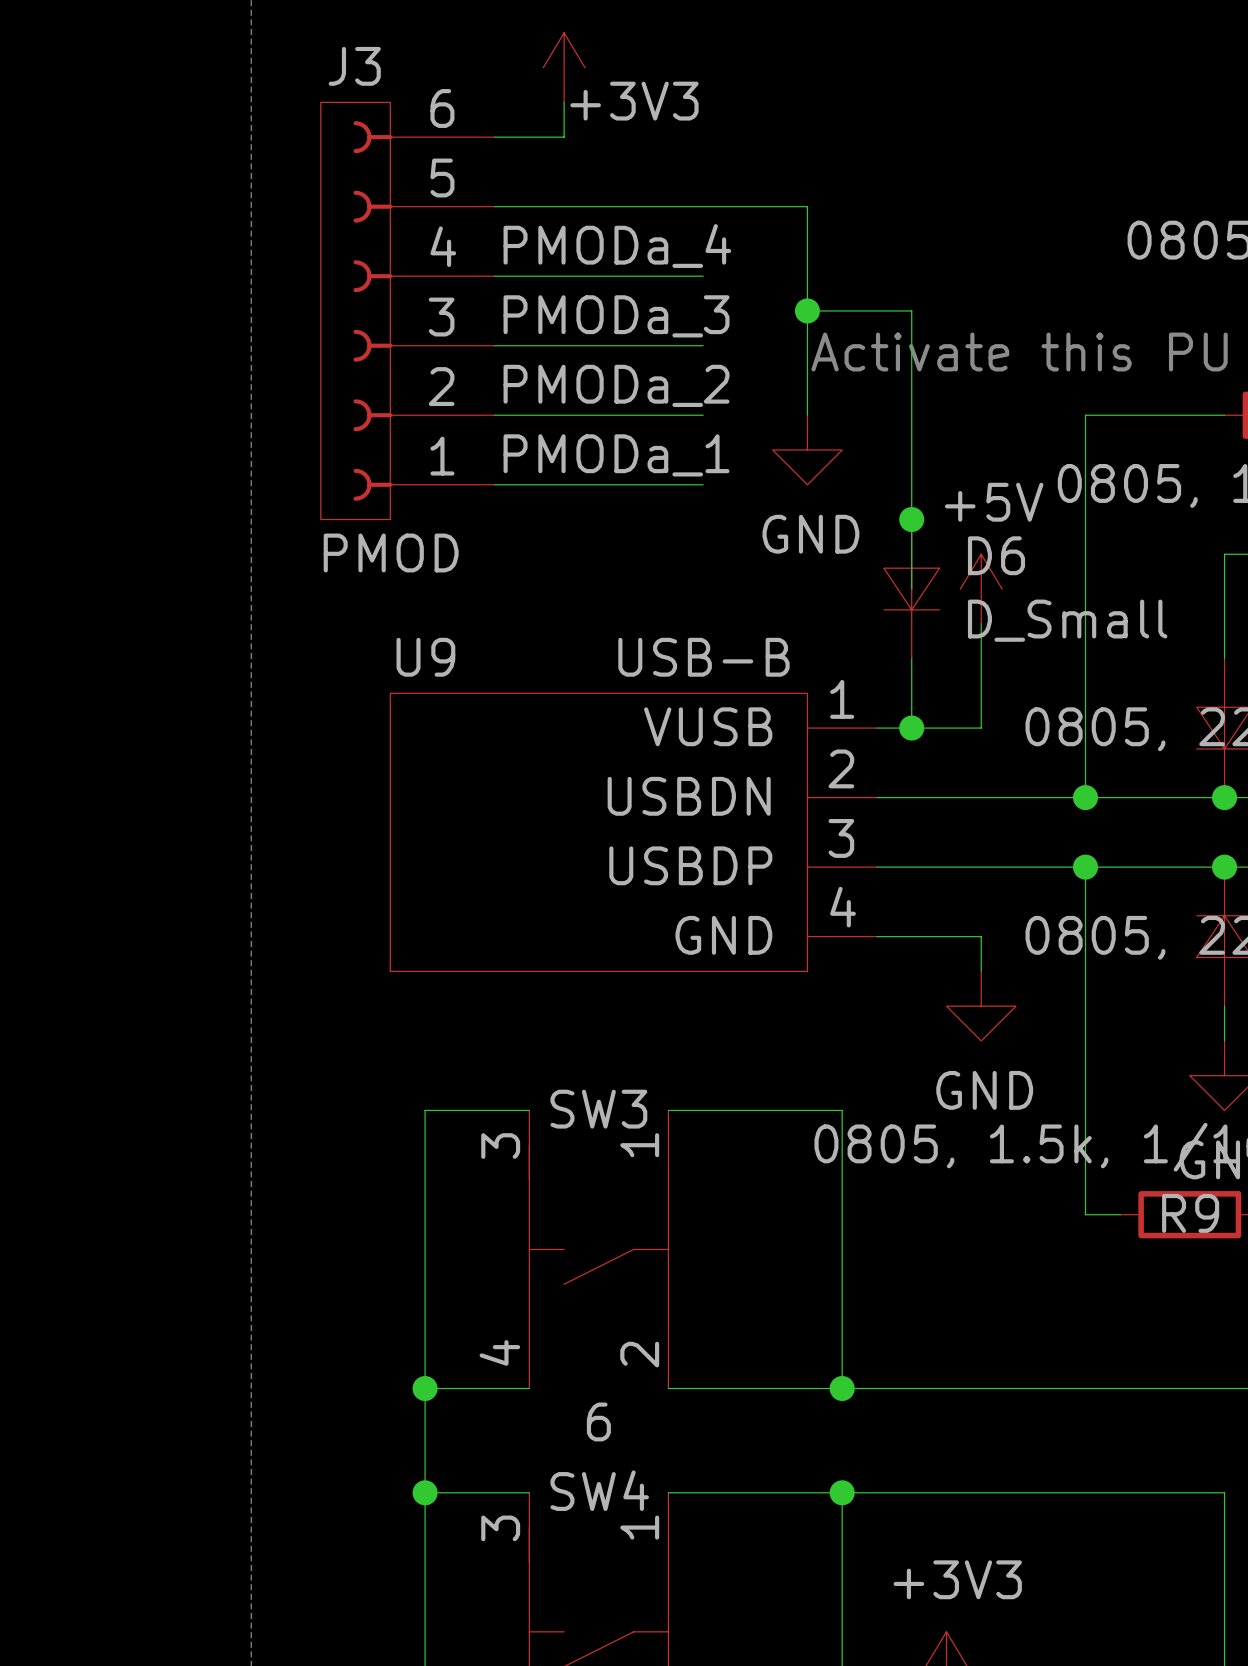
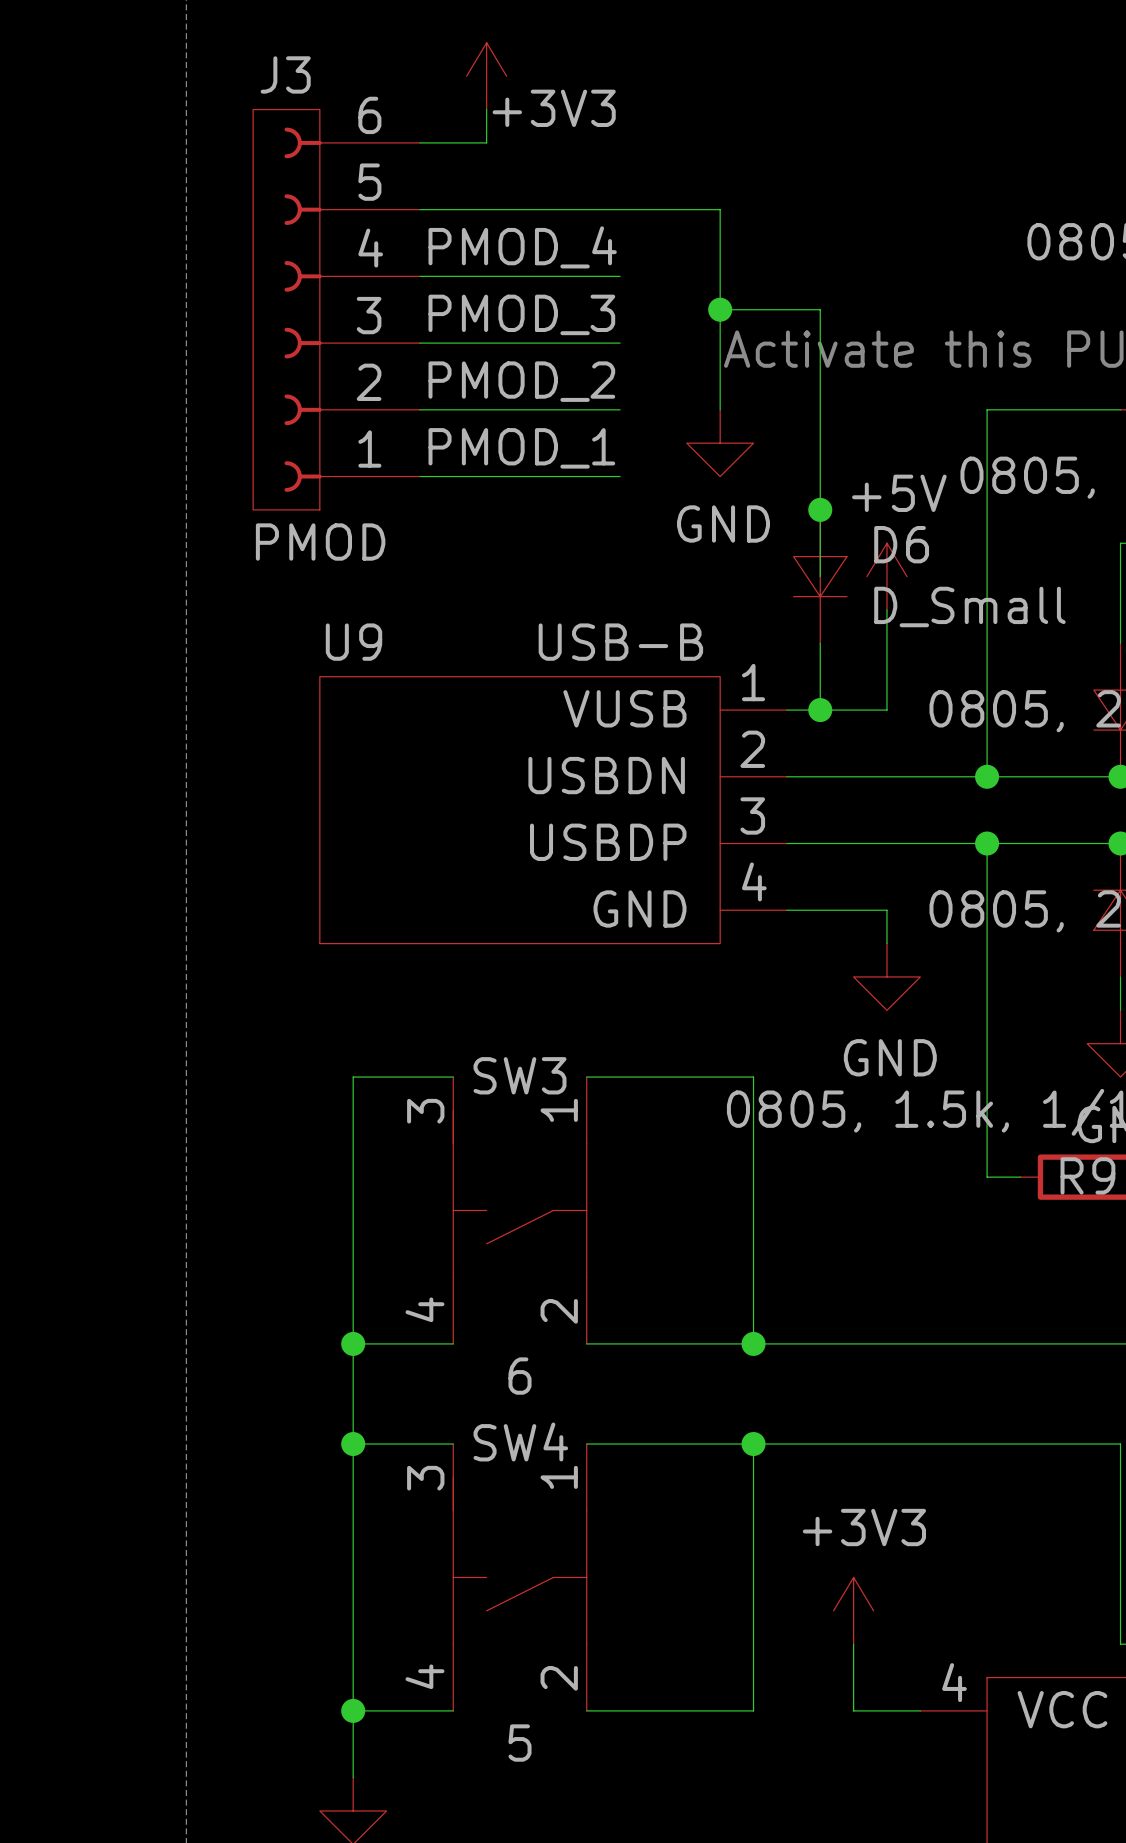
label: PMODa_4 (617, 246) -> PMOD_4 (522, 247)
label: PMODa_3 (616, 316) -> PMOD_3 (521, 314)
label: PMODa_2 (616, 385) -> PMOD_2 (521, 381)
label: PMODa_1 (616, 455) -> PMOD_1 (521, 448)

